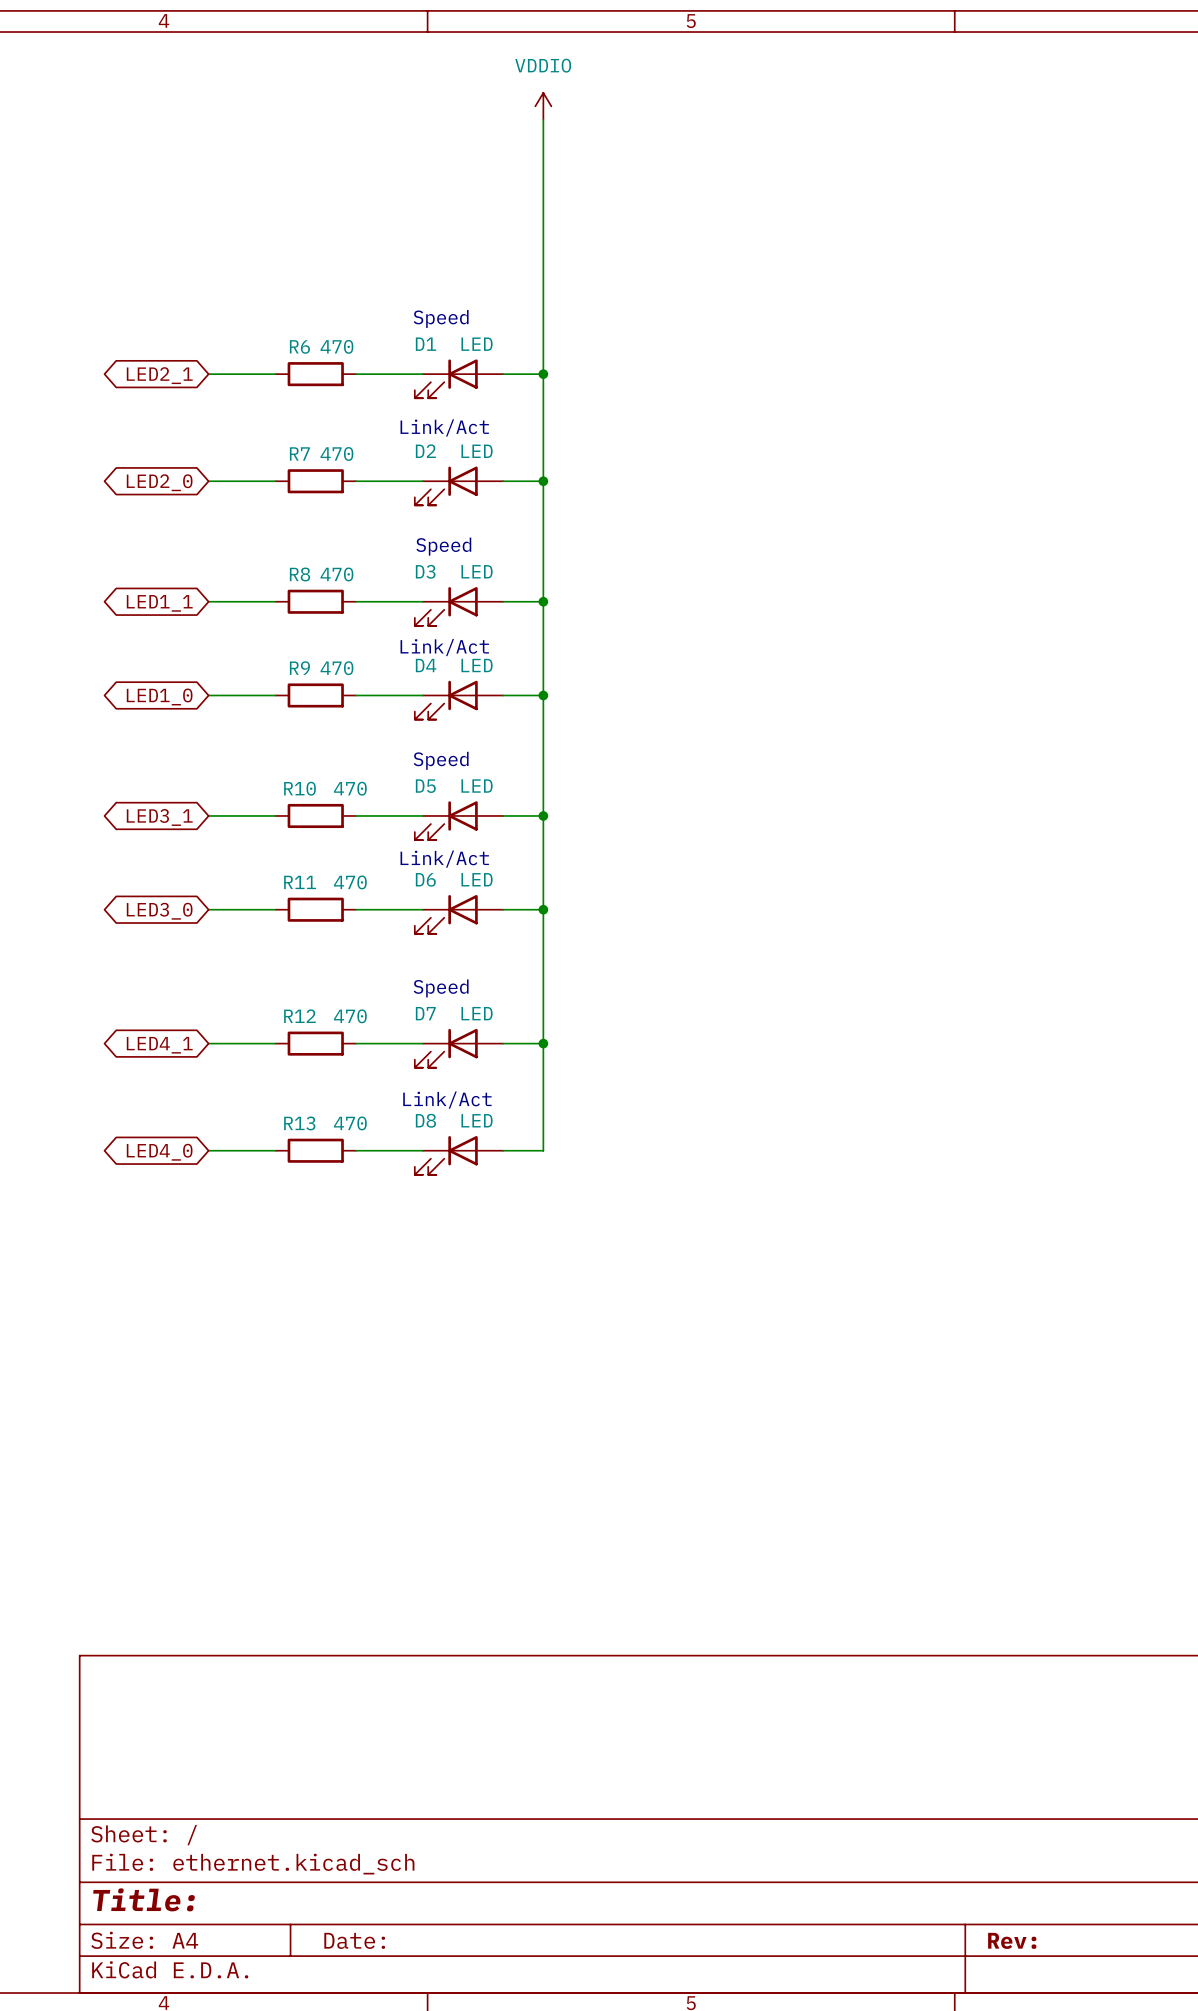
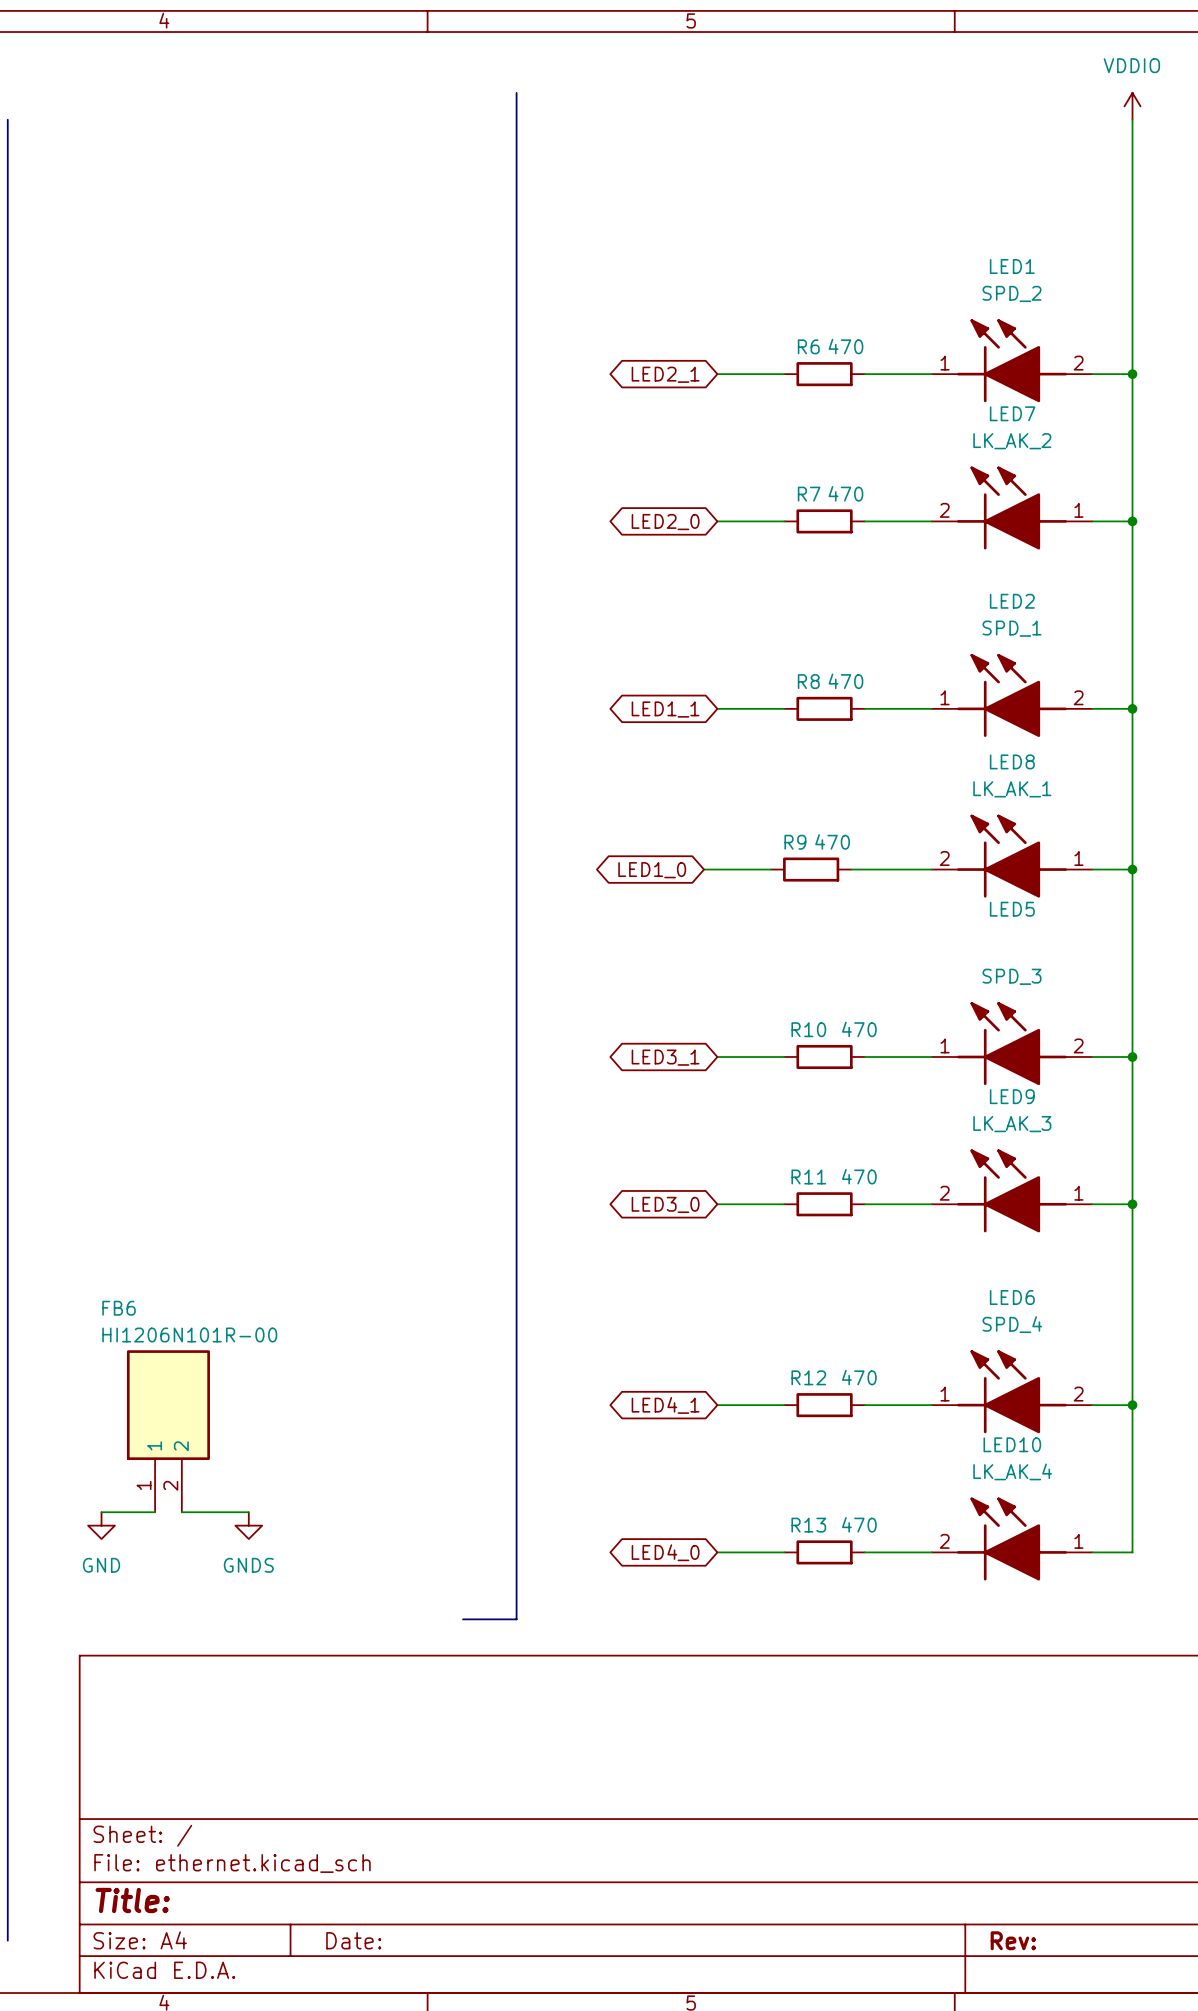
line: none -> (516, 92) (516, 1619) (463, 1619)
power symbol: VDDIO (543, 106) -> none
power symbol: none -> VDDIO (1132, 106)
line: none -> (7, 119) (7, 1940)
wire: (543, 119) (543, 1150) (503, 1150) -> none
wire: none -> (1132, 119) (1132, 1552) (1092, 1552)
text: Speed (441, 318) -> none
LED1: none -> SPD_2 (1012, 360)
wire: (208, 374) (275, 374) -> none
R6 position: (315, 374) -> (824, 374)
wire: (355, 374) (422, 374) -> none
wire: (503, 374) (543, 374) -> none
junction: (543, 374) -> none
wire: none -> (717, 374) (784, 374)
wire: none -> (864, 374) (931, 374)
wire: none -> (1092, 374) (1132, 374)
junction: none -> (1132, 374)
global label: LED2_1 (159, 375) -> none
global label: none -> LED2_1 (665, 374)
D1: LED (459, 378) -> none
text: Link/Act (444, 427) -> none
wire: (208, 481) (275, 481) -> none
R7 position: (315, 481) -> (824, 521)
wire: (355, 481) (422, 481) -> none
wire: (503, 481) (543, 481) -> none
junction: (543, 481) -> none
global label: LED2_0 (159, 482) -> none
D2: LED (459, 485) -> none
LED7: none -> LK_AK_2 (1012, 508)
wire: none -> (717, 521) (784, 521)
wire: none -> (864, 521) (931, 521)
wire: none -> (1092, 521) (1132, 521)
junction: none -> (1132, 521)
global label: none -> LED2_0 (665, 522)
text: Speed (443, 546) -> none
wire: (208, 601) (275, 601) -> none
R8 position: (315, 601) -> (824, 708)
wire: (355, 601) (422, 601) -> none
wire: (503, 601) (543, 601) -> none
junction: (543, 601) -> none
global label: LED1_1 (159, 603) -> none
D3: LED (459, 606) -> none
text: Link/Act (444, 647) -> none
wire: (208, 695) (275, 695) -> none
R9 position: (315, 695) -> (811, 869)
wire: (355, 695) (422, 695) -> none
wire: (503, 695) (543, 695) -> none
junction: (543, 695) -> none
LED2: none -> SPD_1 (1012, 695)
global label: LED1_0 (159, 696) -> none
D4: LED (459, 700) -> none
wire: none -> (717, 708) (784, 708)
wire: none -> (864, 708) (931, 708)
wire: none -> (1092, 708) (1132, 708)
junction: none -> (1132, 708)
global label: none -> LED1_1 (665, 709)
text: Speed (441, 760) -> none
wire: (208, 815) (275, 815) -> none
R10 position: (315, 815) -> (824, 1057)
wire: (355, 815) (422, 815) -> none
wire: (503, 815) (543, 815) -> none
junction: (543, 815) -> none
global label: LED3_1 (159, 817) -> none
D5: LED (459, 820) -> none
LED8: none -> LK_AK_1 (1012, 856)
text: Link/Act (444, 859) -> none
wire: none -> (704, 869) (770, 869)
wire: none -> (851, 869) (931, 869)
wire: none -> (1092, 869) (1132, 869)
junction: none -> (1132, 869)
global label: none -> LED1_0 (652, 870)
wire: (208, 909) (275, 909) -> none
R11 position: (315, 909) -> (824, 1204)
wire: (355, 909) (422, 909) -> none
wire: (503, 909) (543, 909) -> none
junction: (543, 909) -> none
global label: LED3_0 (159, 911) -> none
D6: LED (459, 914) -> none
text: Speed (441, 988) -> none
wire: (208, 1043) (275, 1043) -> none
R12 position: (315, 1043) -> (824, 1405)
wire: (355, 1043) (422, 1043) -> none
wire: (503, 1043) (543, 1043) -> none
junction: (543, 1043) -> none
LED5: none -> SPD_3 (1012, 1043)
global label: LED4_1 (159, 1045) -> none
D7: LED (459, 1048) -> none
wire: none -> (717, 1057) (784, 1057)
wire: none -> (864, 1057) (931, 1057)
wire: none -> (1092, 1057) (1132, 1057)
junction: none -> (1132, 1057)
global label: none -> LED3_1 (665, 1057)
text: Link/Act (447, 1100) -> none
wire: (208, 1150) (275, 1150) -> none
R13 position: (315, 1150) -> (824, 1552)
wire: (355, 1150) (422, 1150) -> none
global label: LED4_0 (159, 1152) -> none
D8: LED (459, 1155) -> none
LED9: none -> LK_AK_3 (1012, 1190)
wire: none -> (717, 1204) (784, 1204)
wire: none -> (864, 1204) (931, 1204)
wire: none -> (1092, 1204) (1132, 1204)
junction: none -> (1132, 1204)
global label: none -> LED3_0 (665, 1204)
LED6: none -> SPD_4 (1012, 1391)
wire: none -> (717, 1405) (784, 1405)
wire: none -> (864, 1405) (931, 1405)
wire: none -> (1092, 1405) (1132, 1405)
junction: none -> (1132, 1405)
global label: none -> LED4_1 (665, 1405)
FB6: none -> HI1206N101R-00 (168, 1431)
wire: none -> (101, 1512) (155, 1512)
wire: none -> (181, 1512) (248, 1512)
power symbol: none -> GND (101, 1525)
power symbol: none -> GNDS (248, 1525)
LED10: none -> LK_AK_4 (1012, 1539)
wire: none -> (717, 1552) (784, 1552)
wire: none -> (864, 1552) (931, 1552)
global label: none -> LED4_0 (665, 1552)

